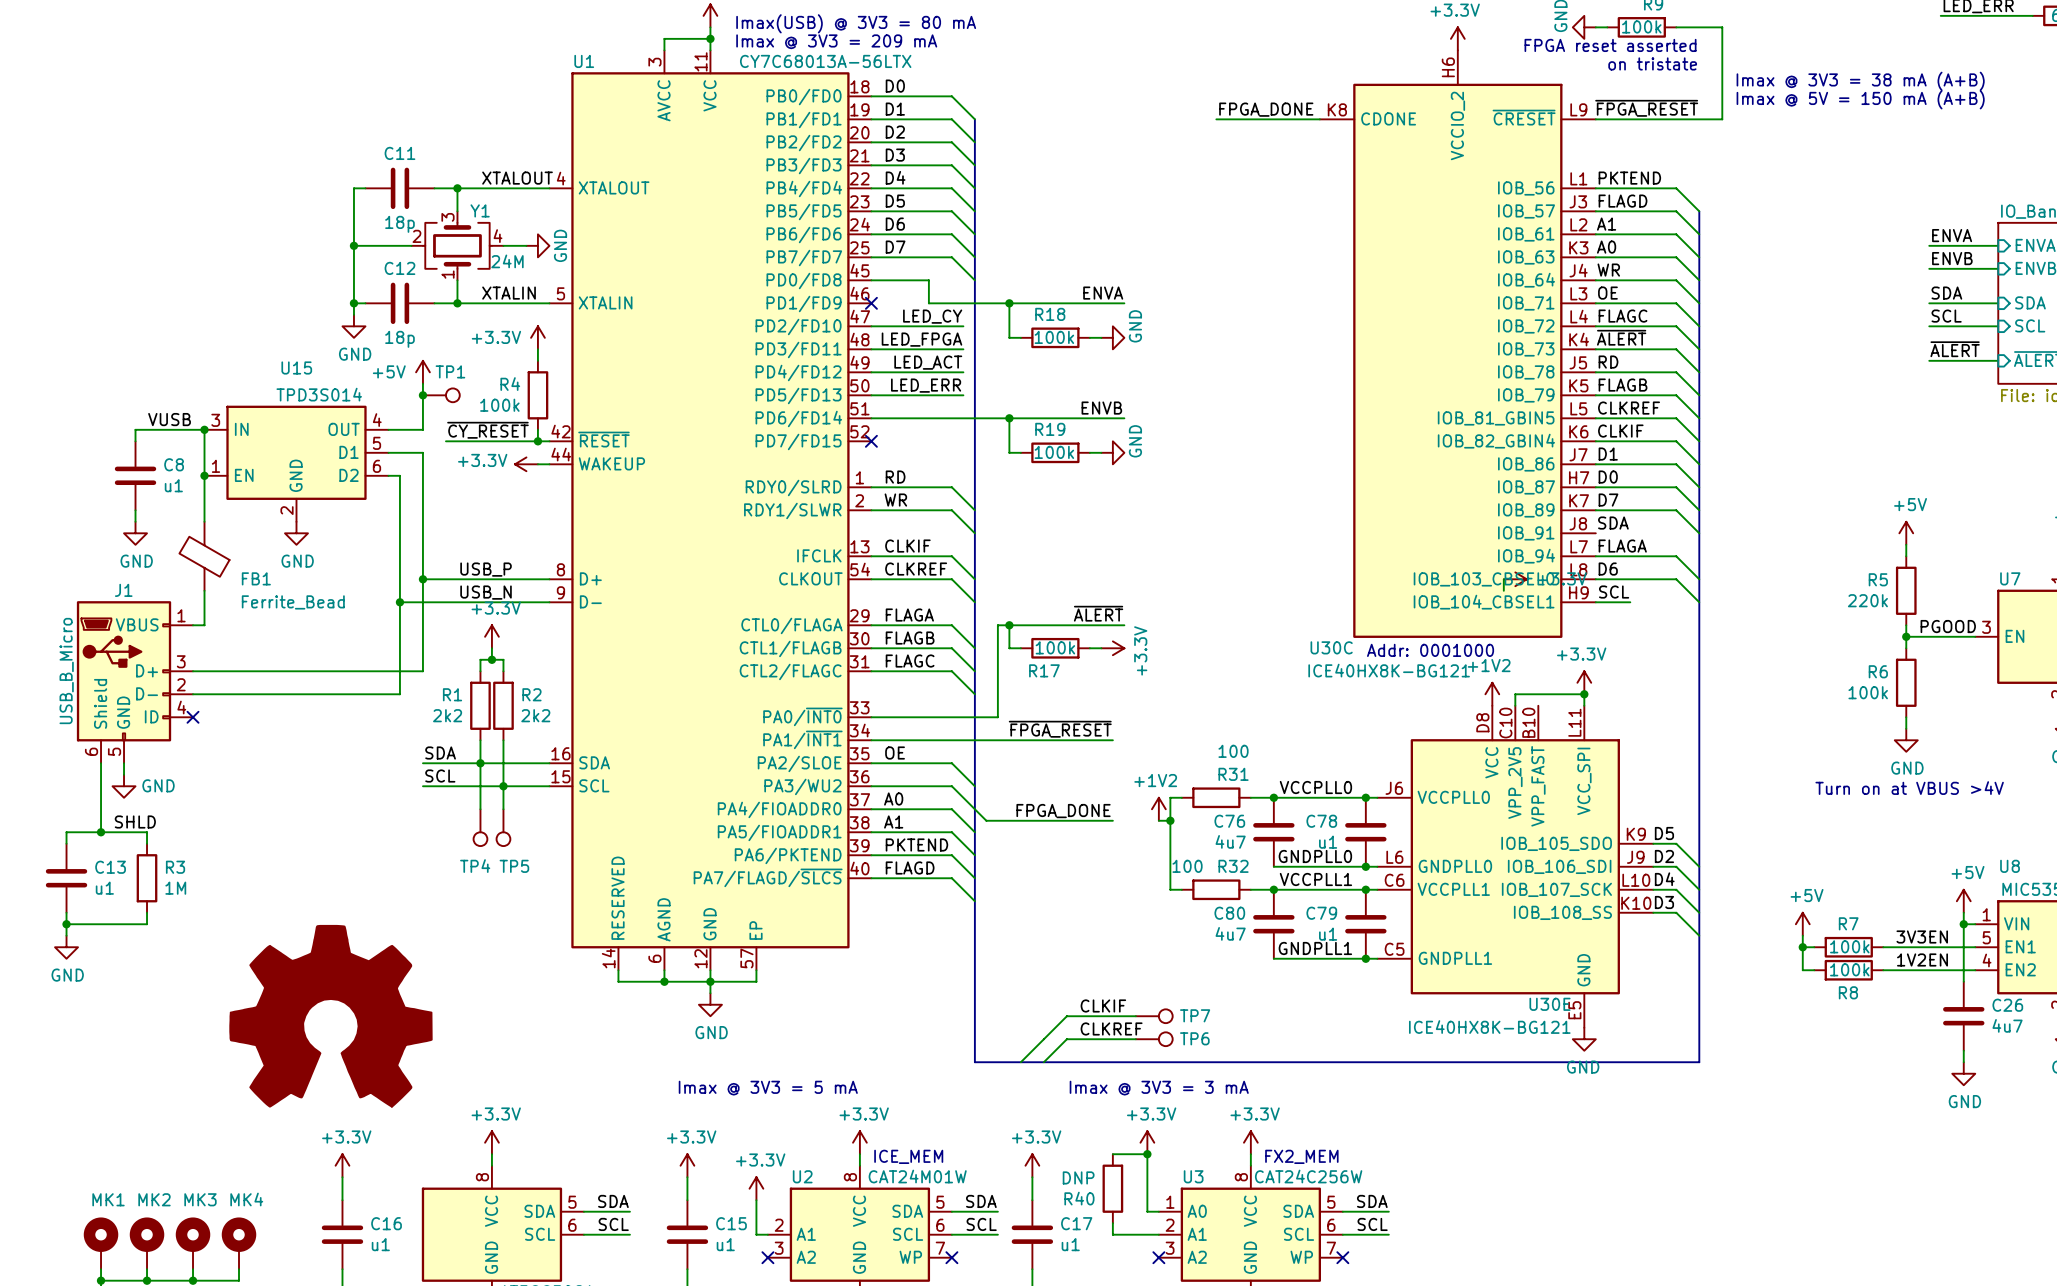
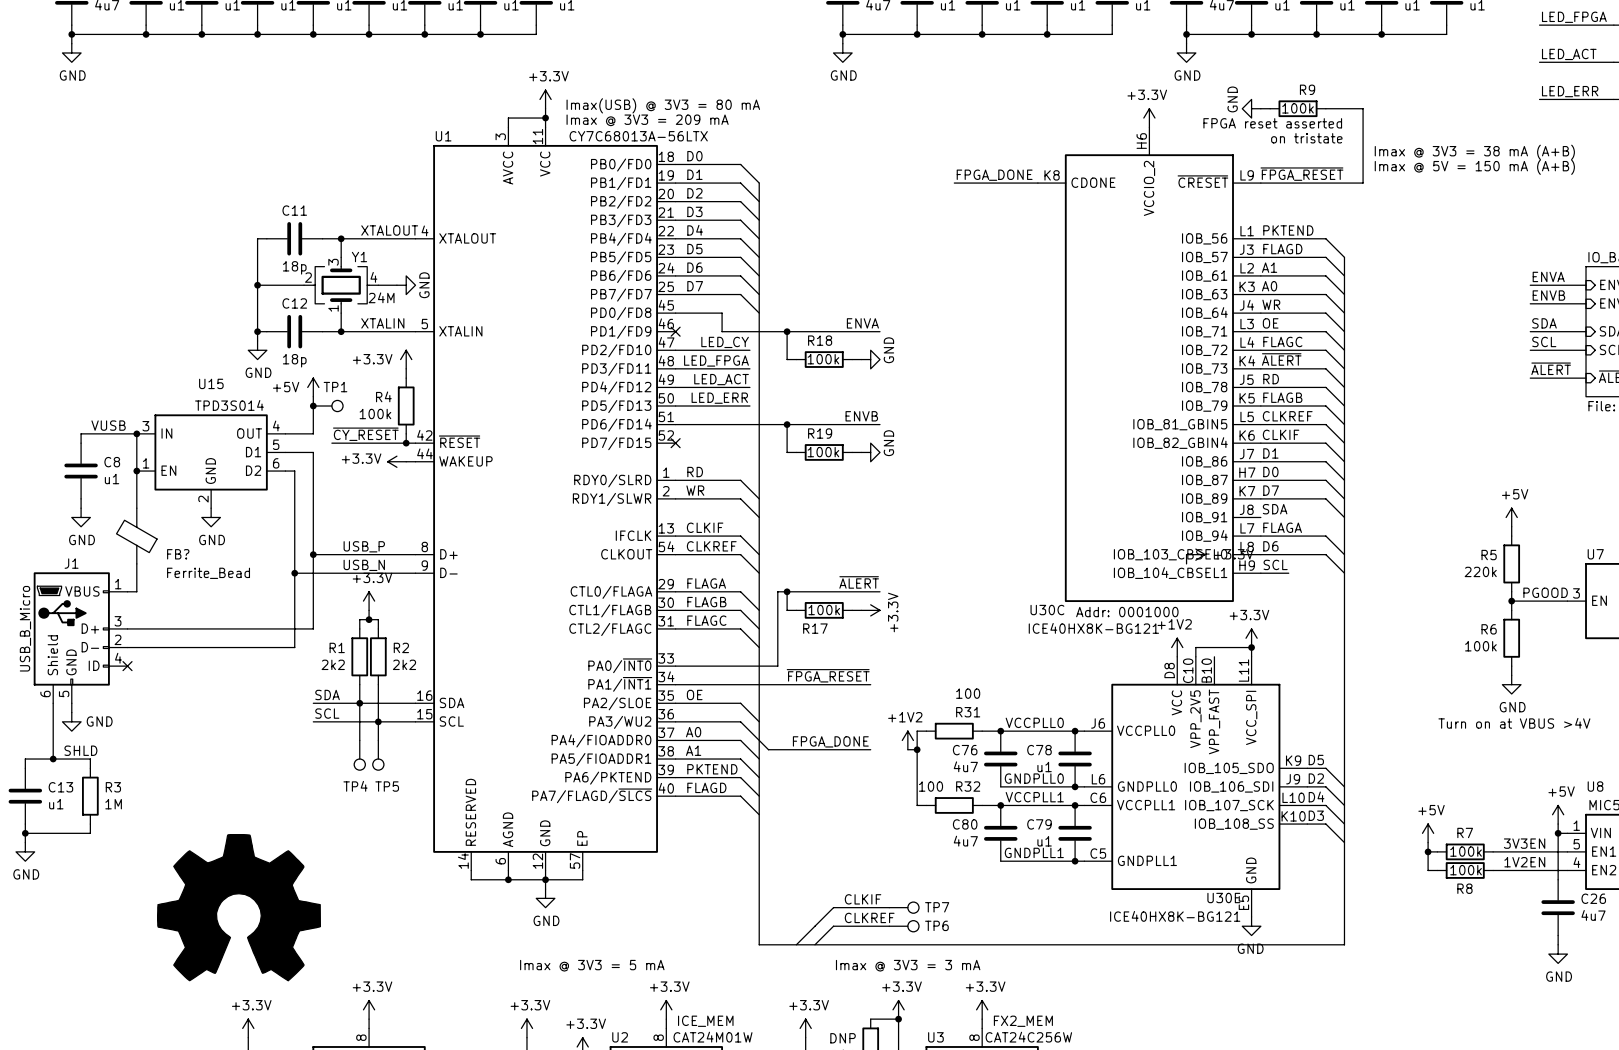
FB1 name: FB1 (256, 578) -> FB? (178, 554)

